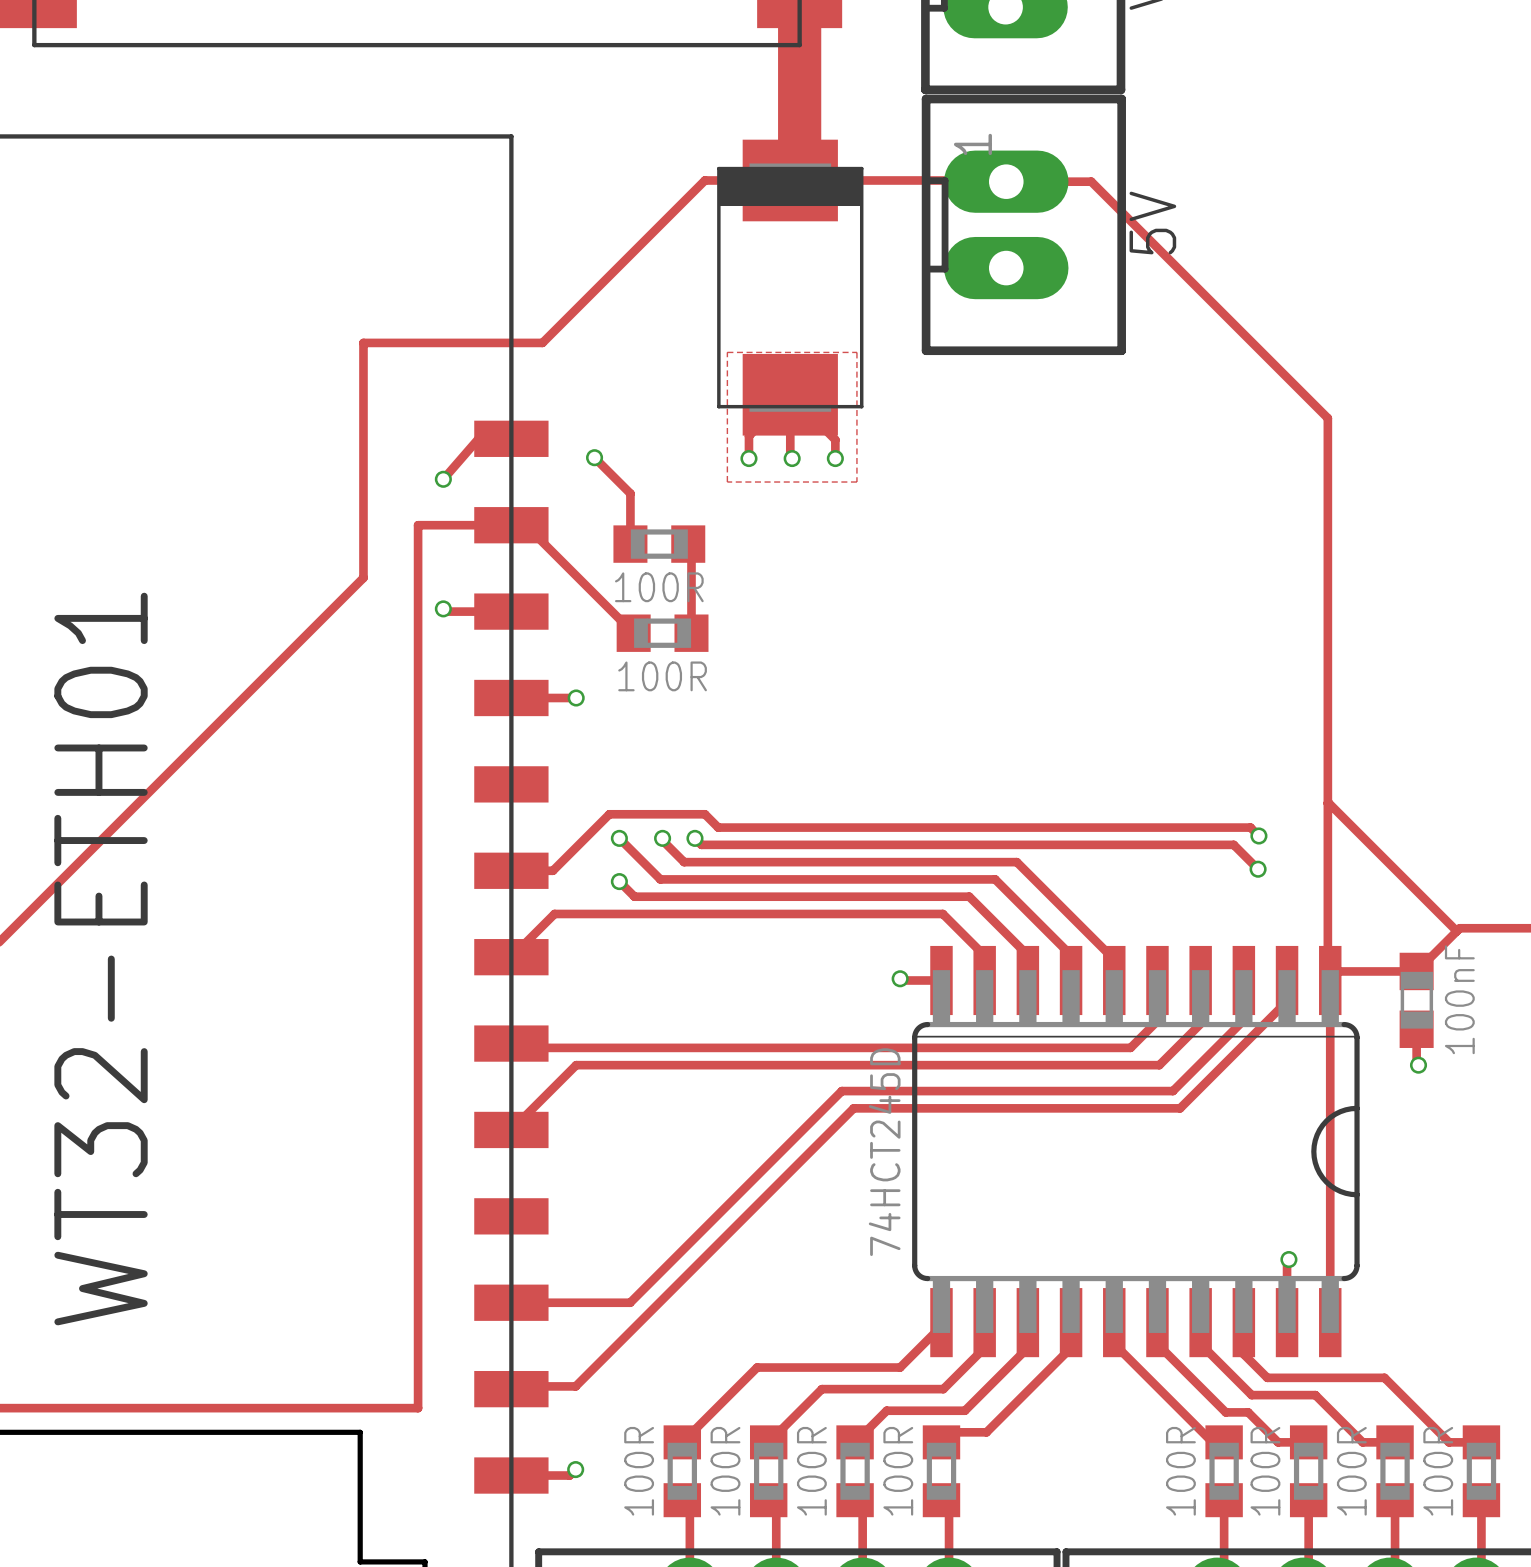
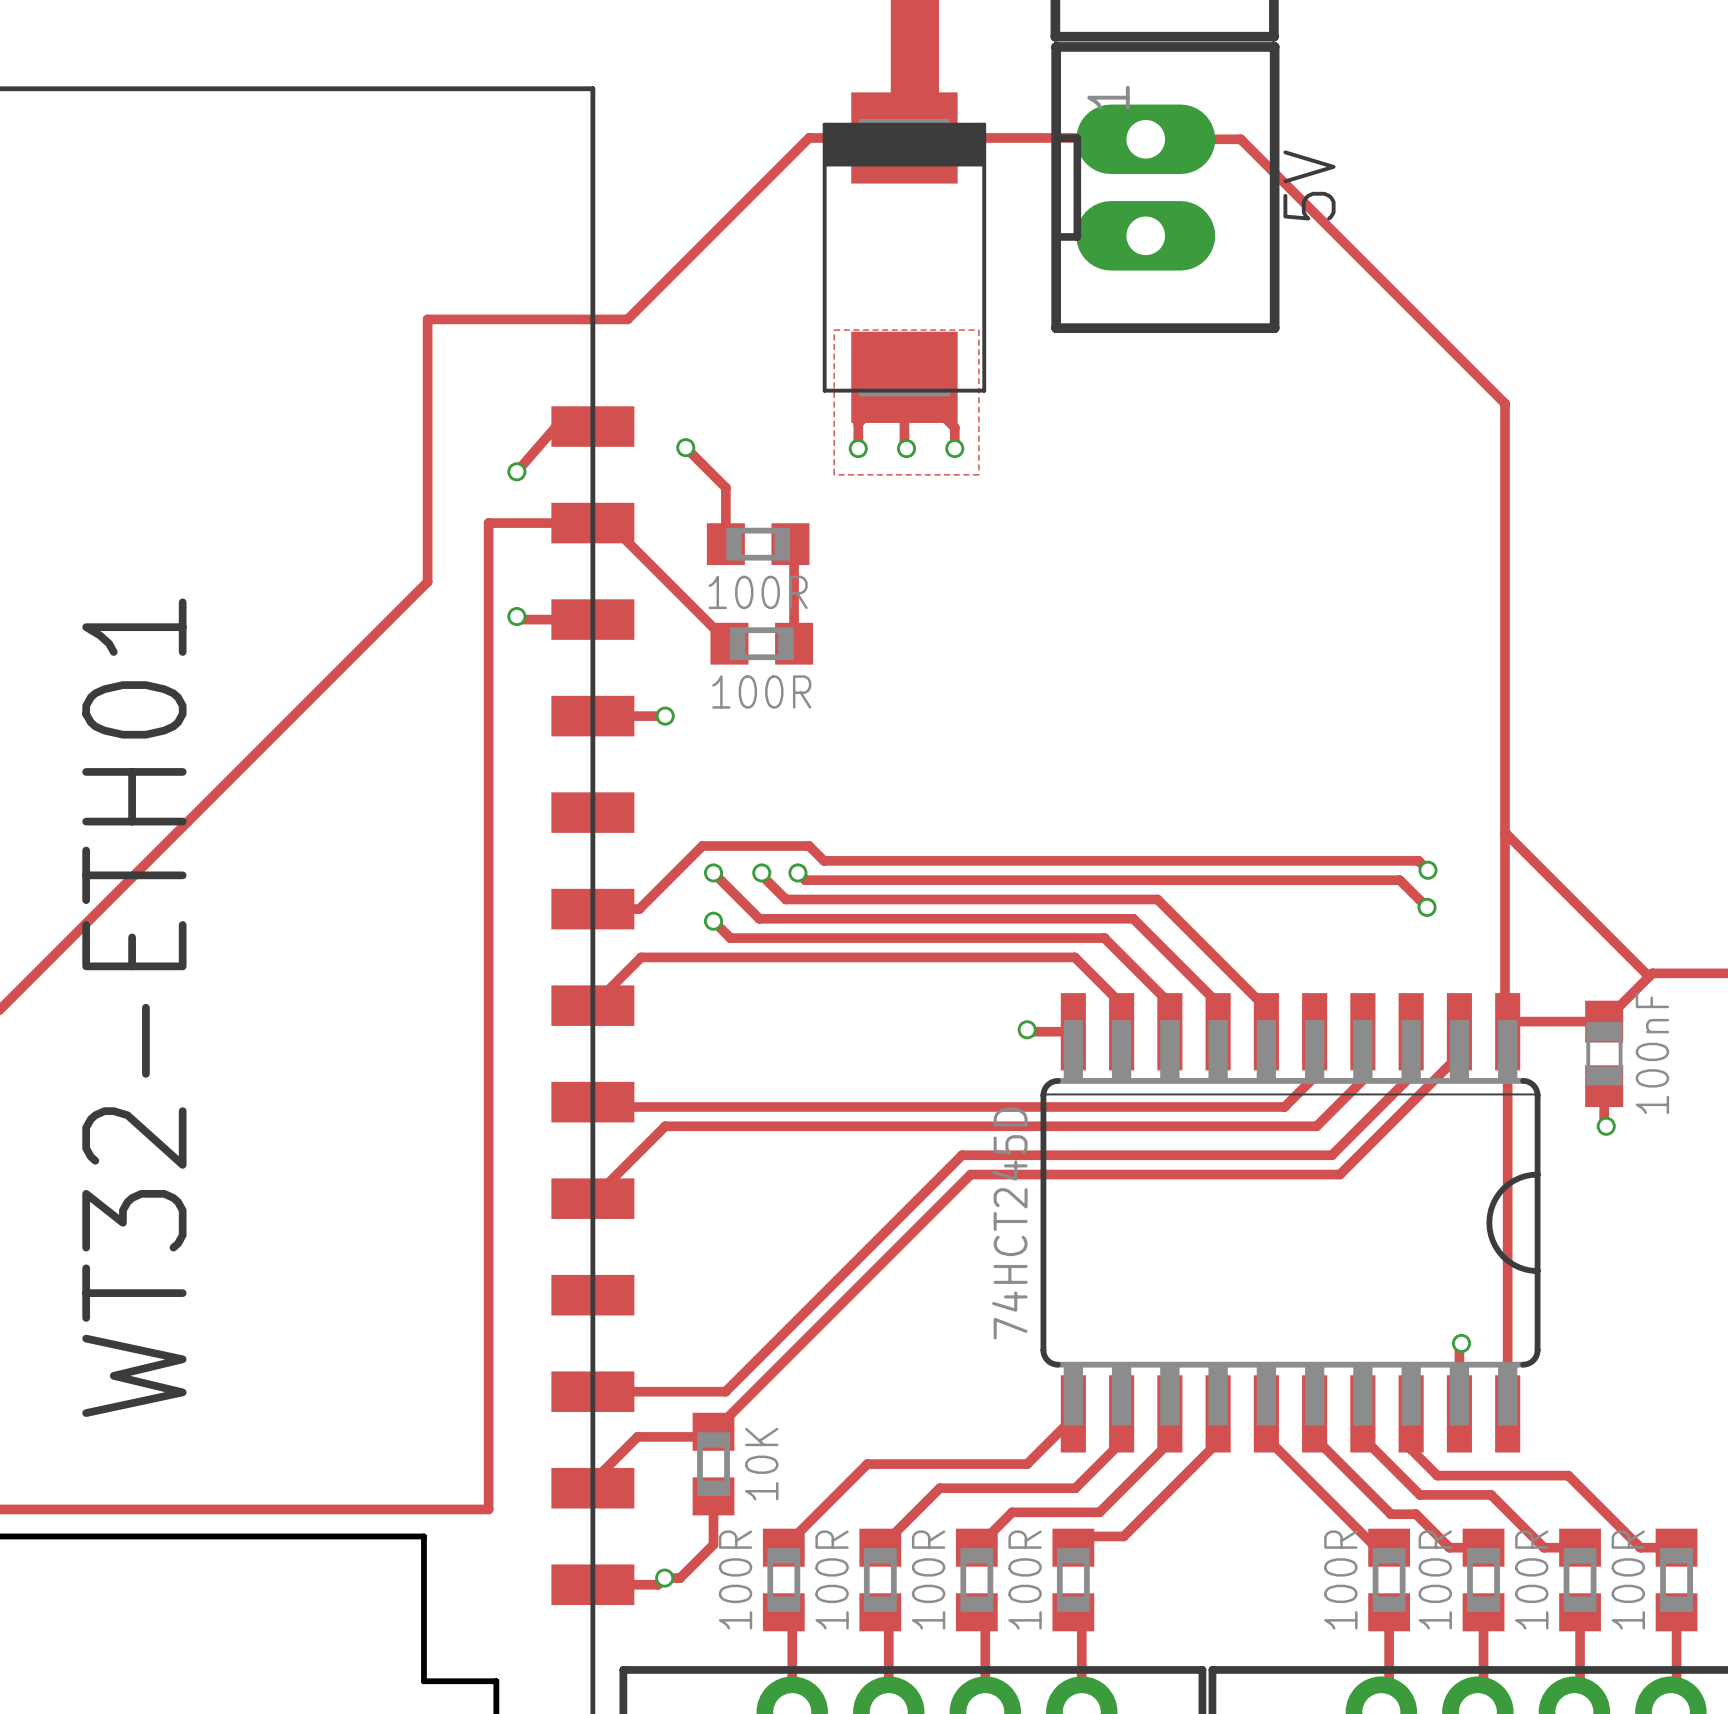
track: (853, 1108) (575, 1386) (511, 1386) -> (975, 1174) (970, 1174) (708, 1436) (637, 1436) (592, 1481) (592, 1485)
part: none -> 10K (713, 1464)
track: none -> (713, 1496) (713, 1544) (680, 1578) (664, 1578)

